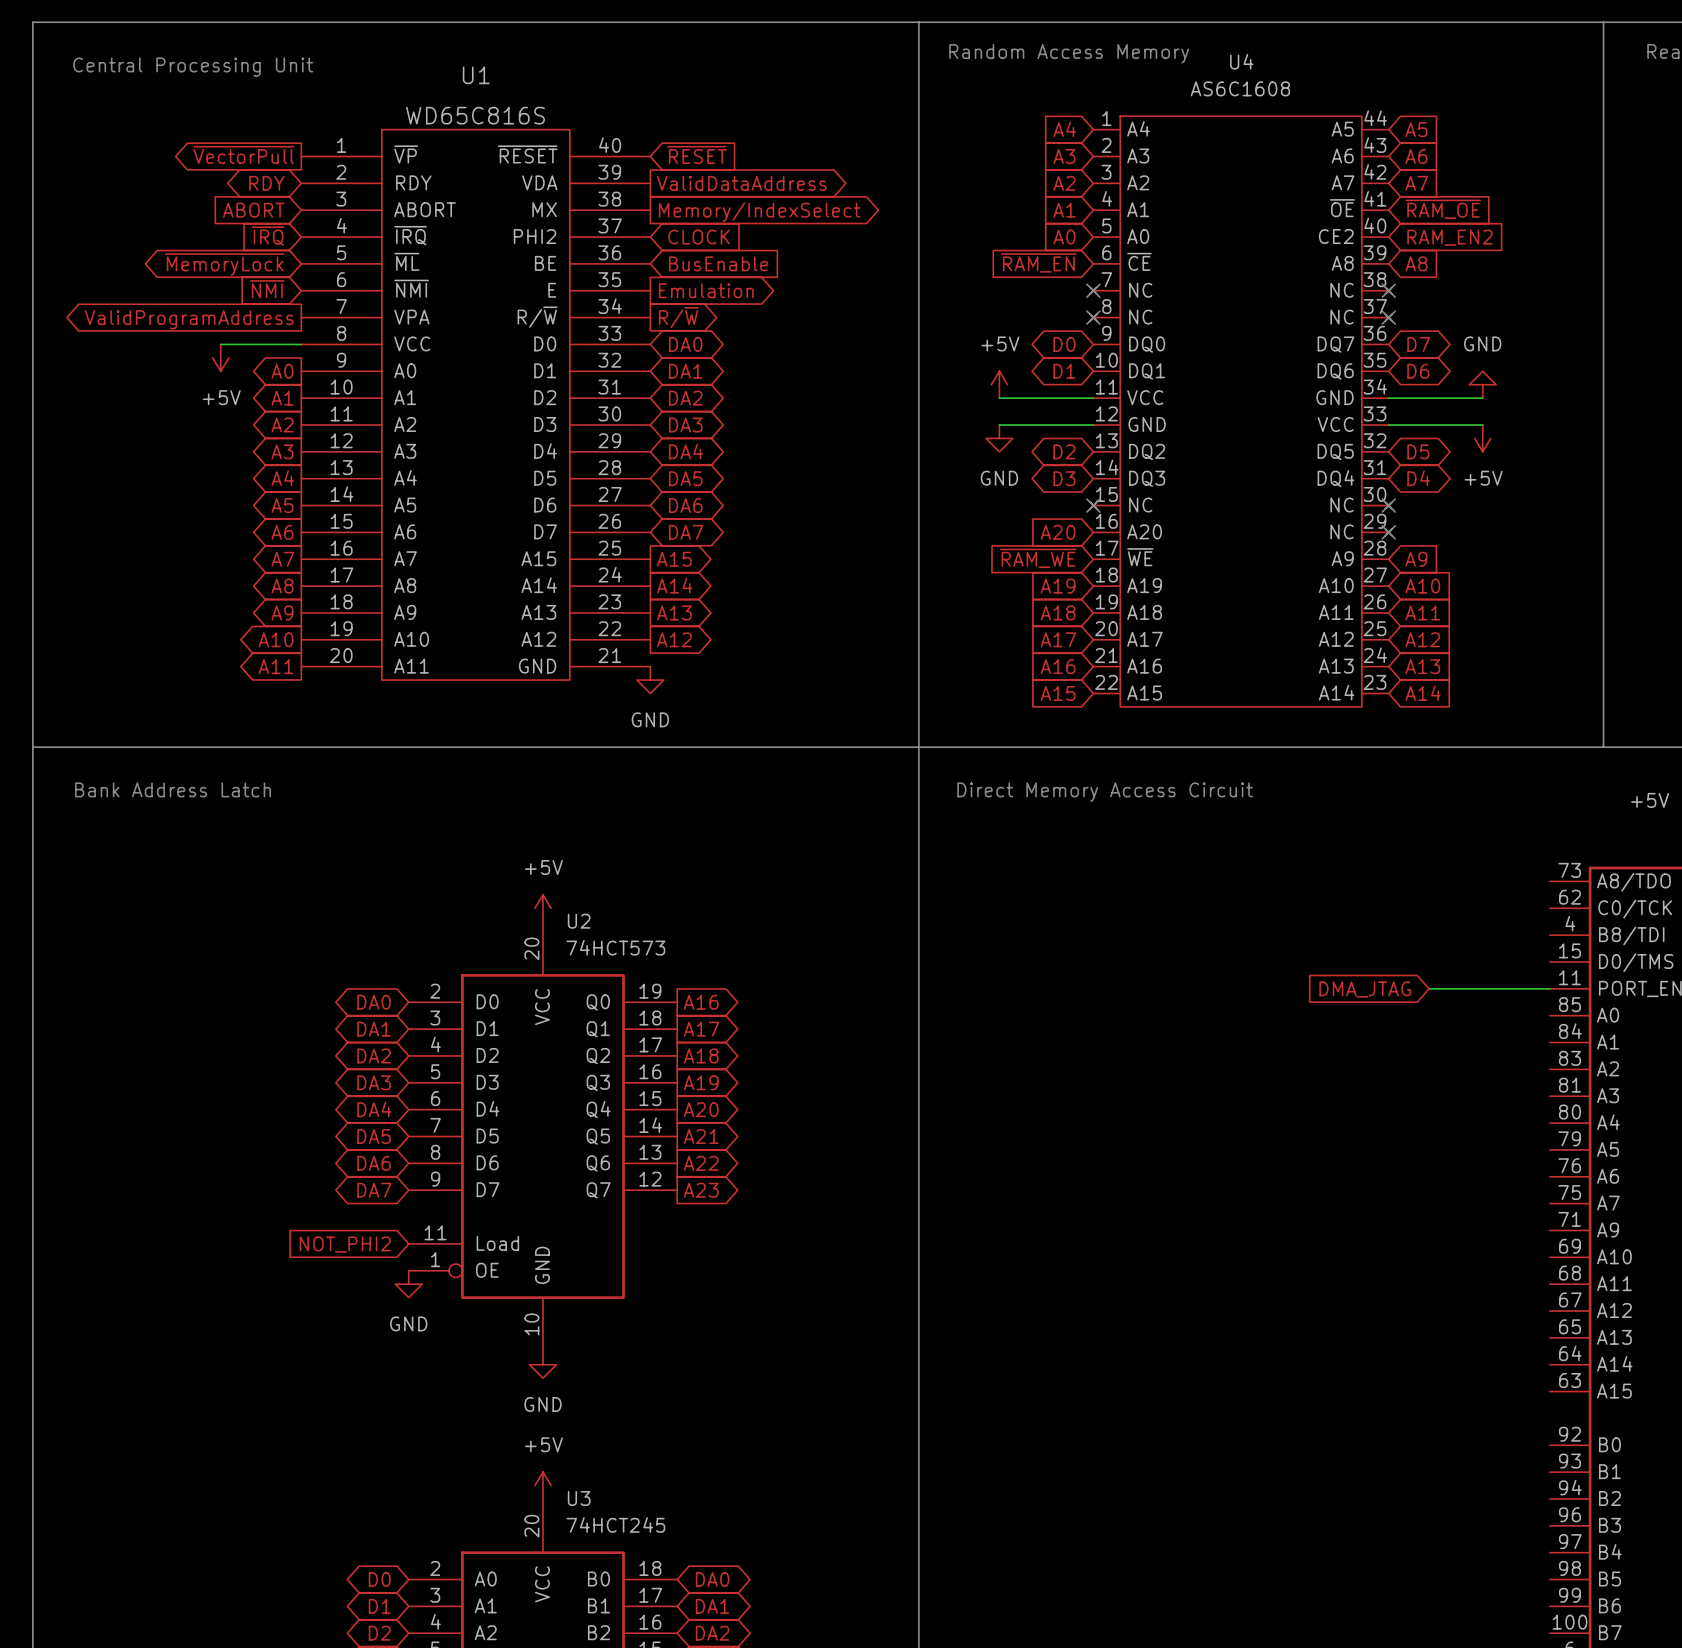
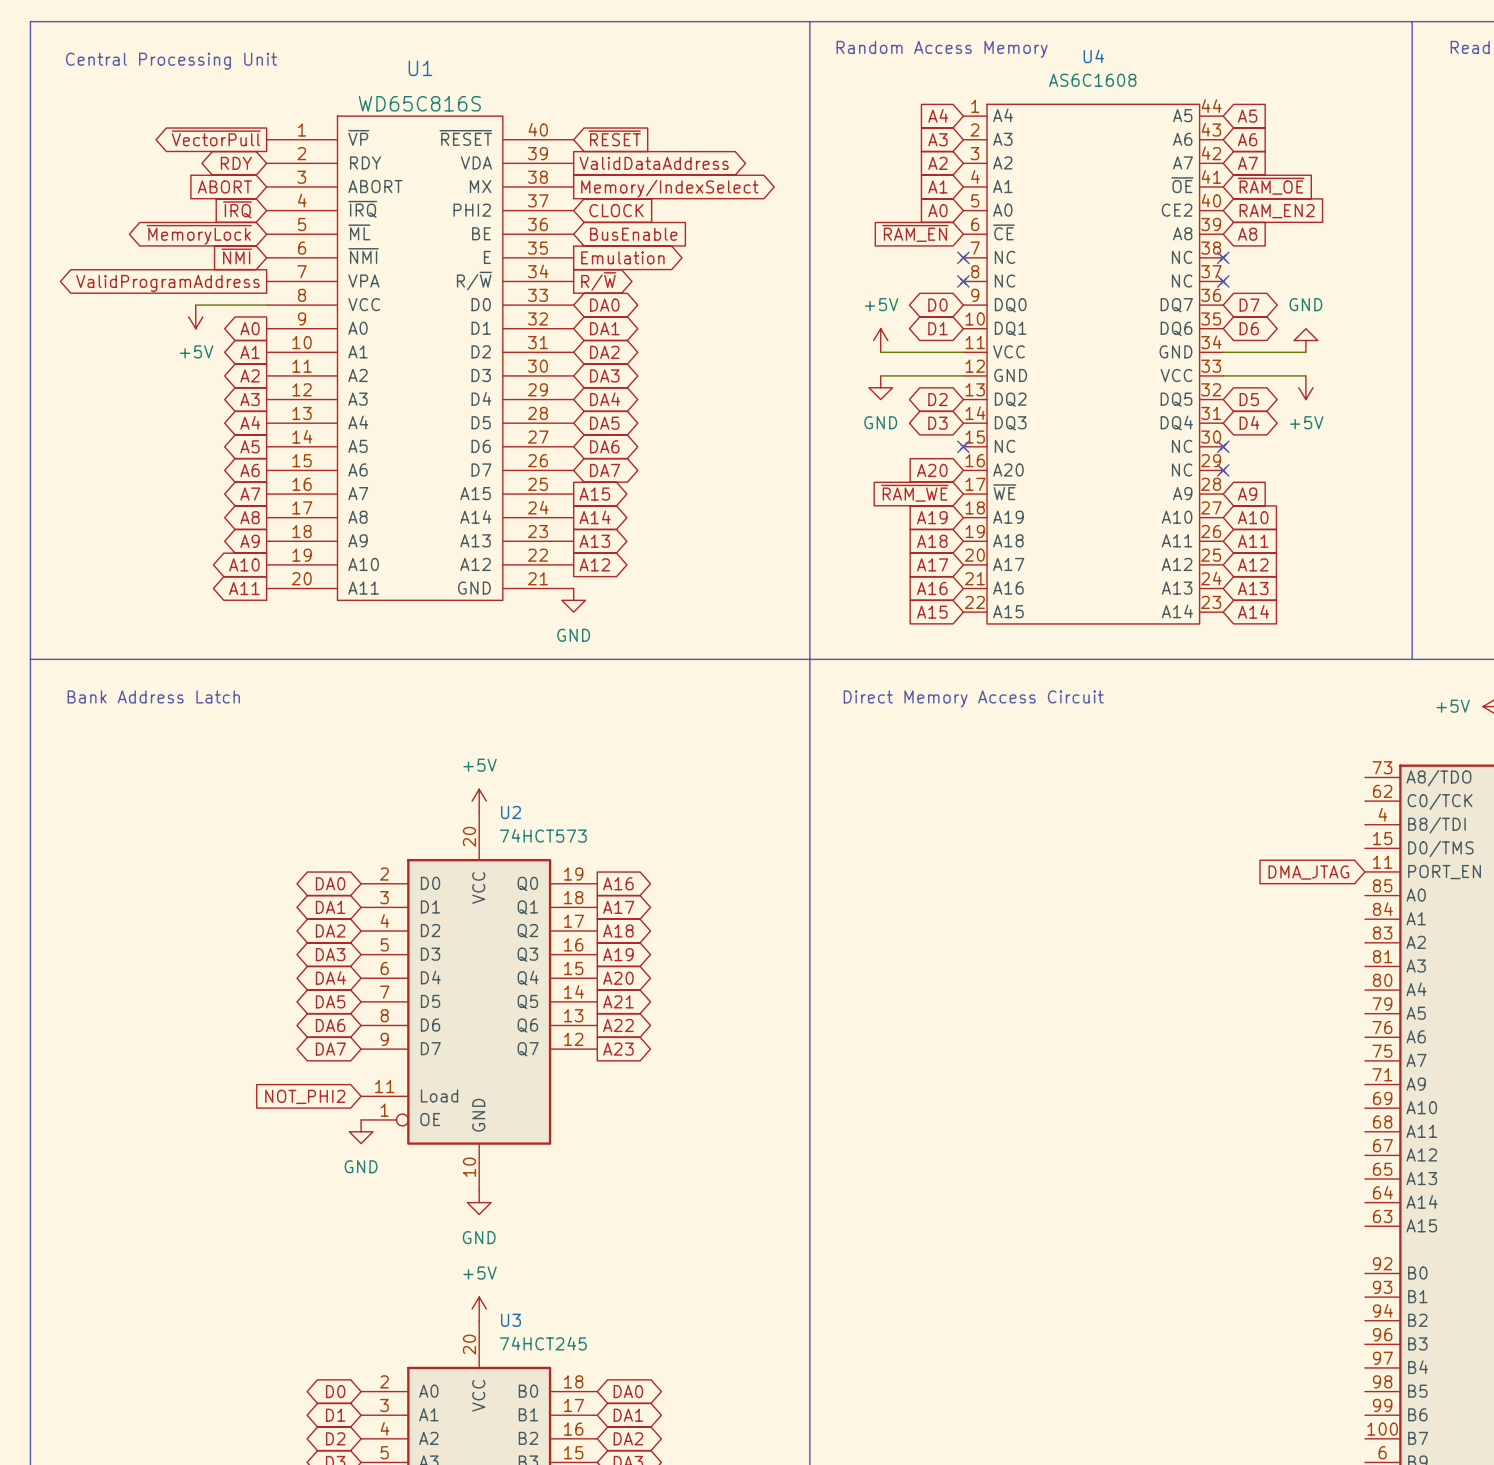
wire: (1429, 988) (1549, 988) -> none
global label position: DMA_JTAG (1365, 989) -> DMA_JTAG (1308, 872)

